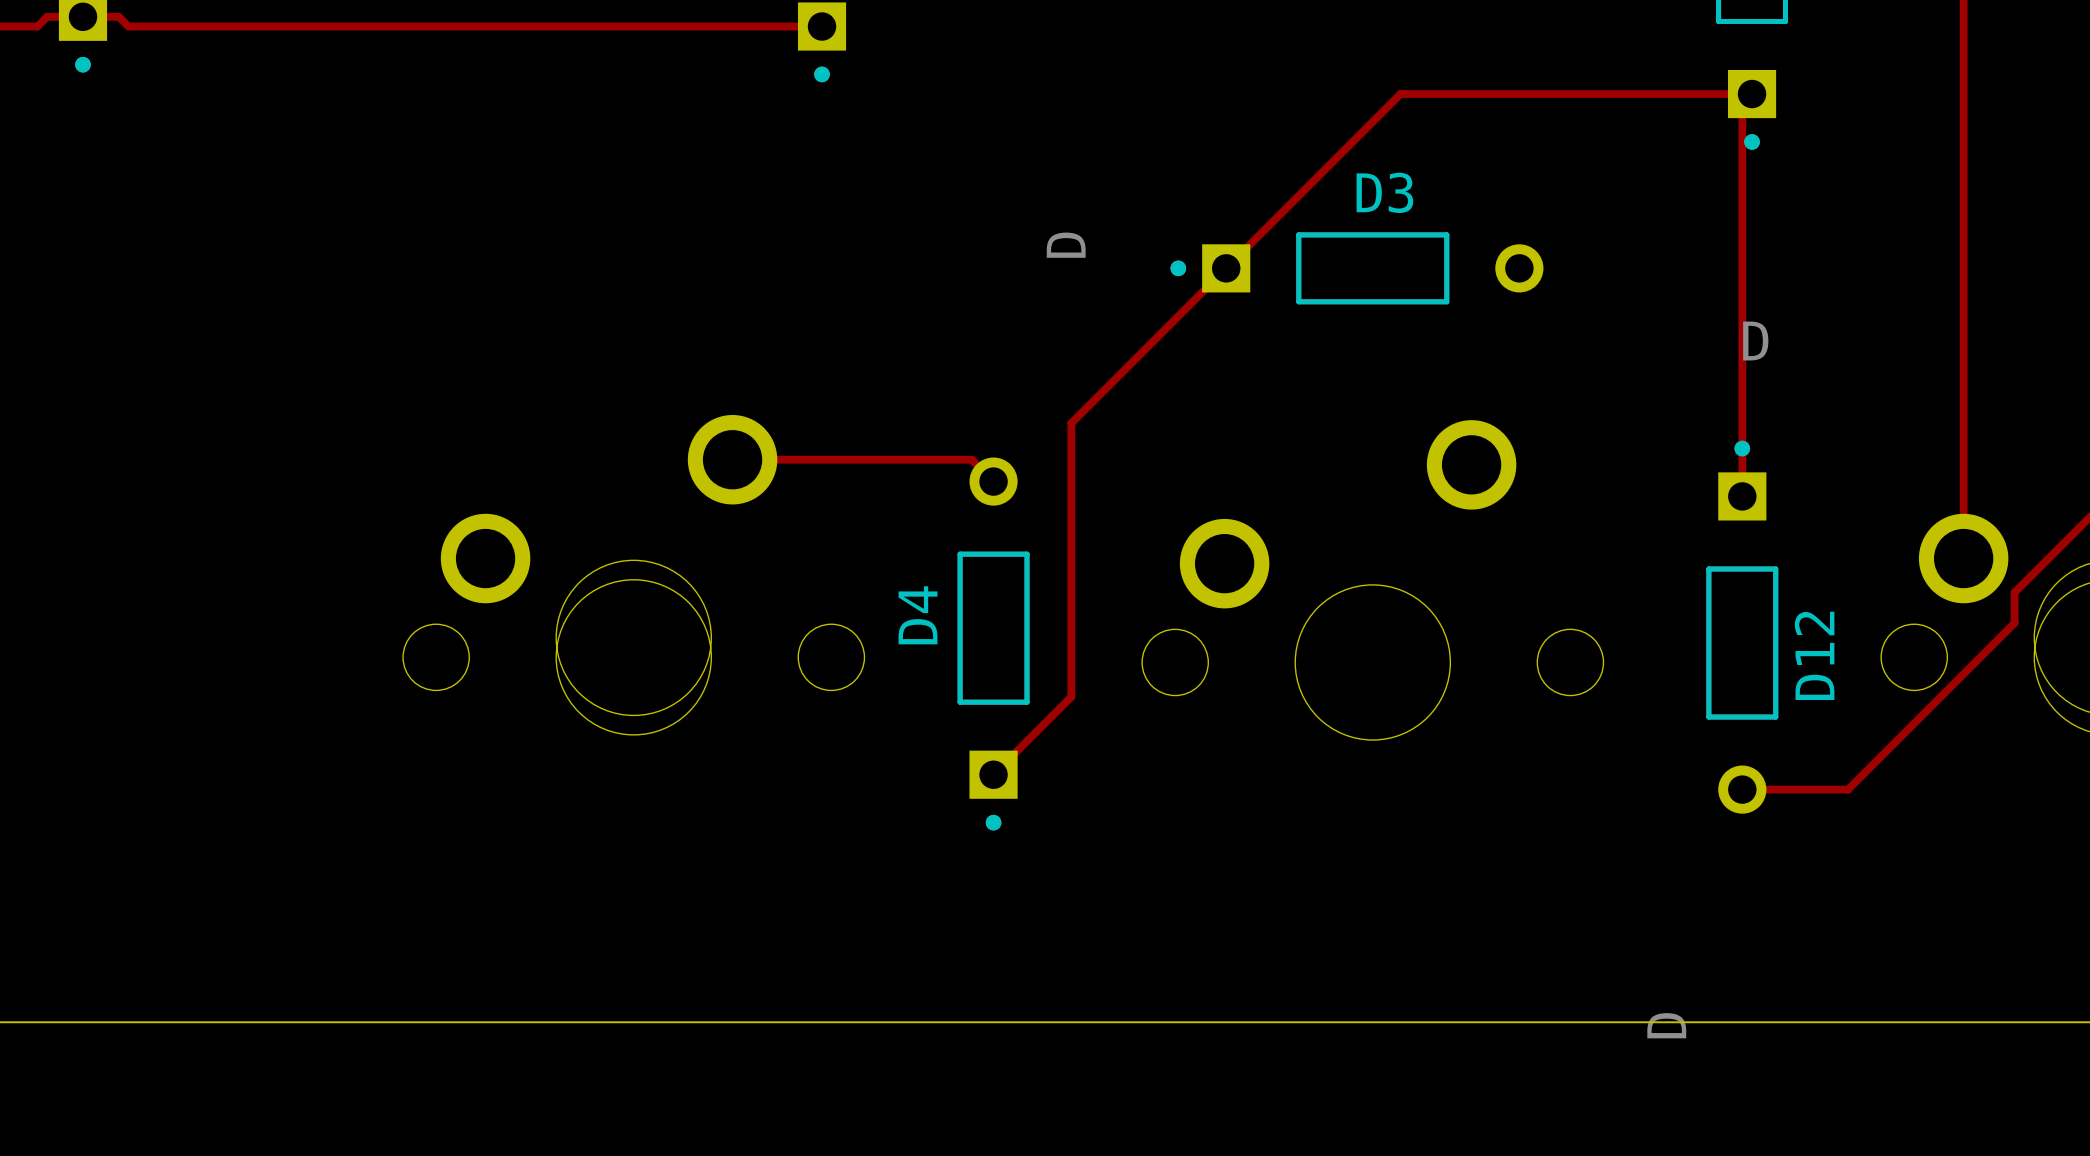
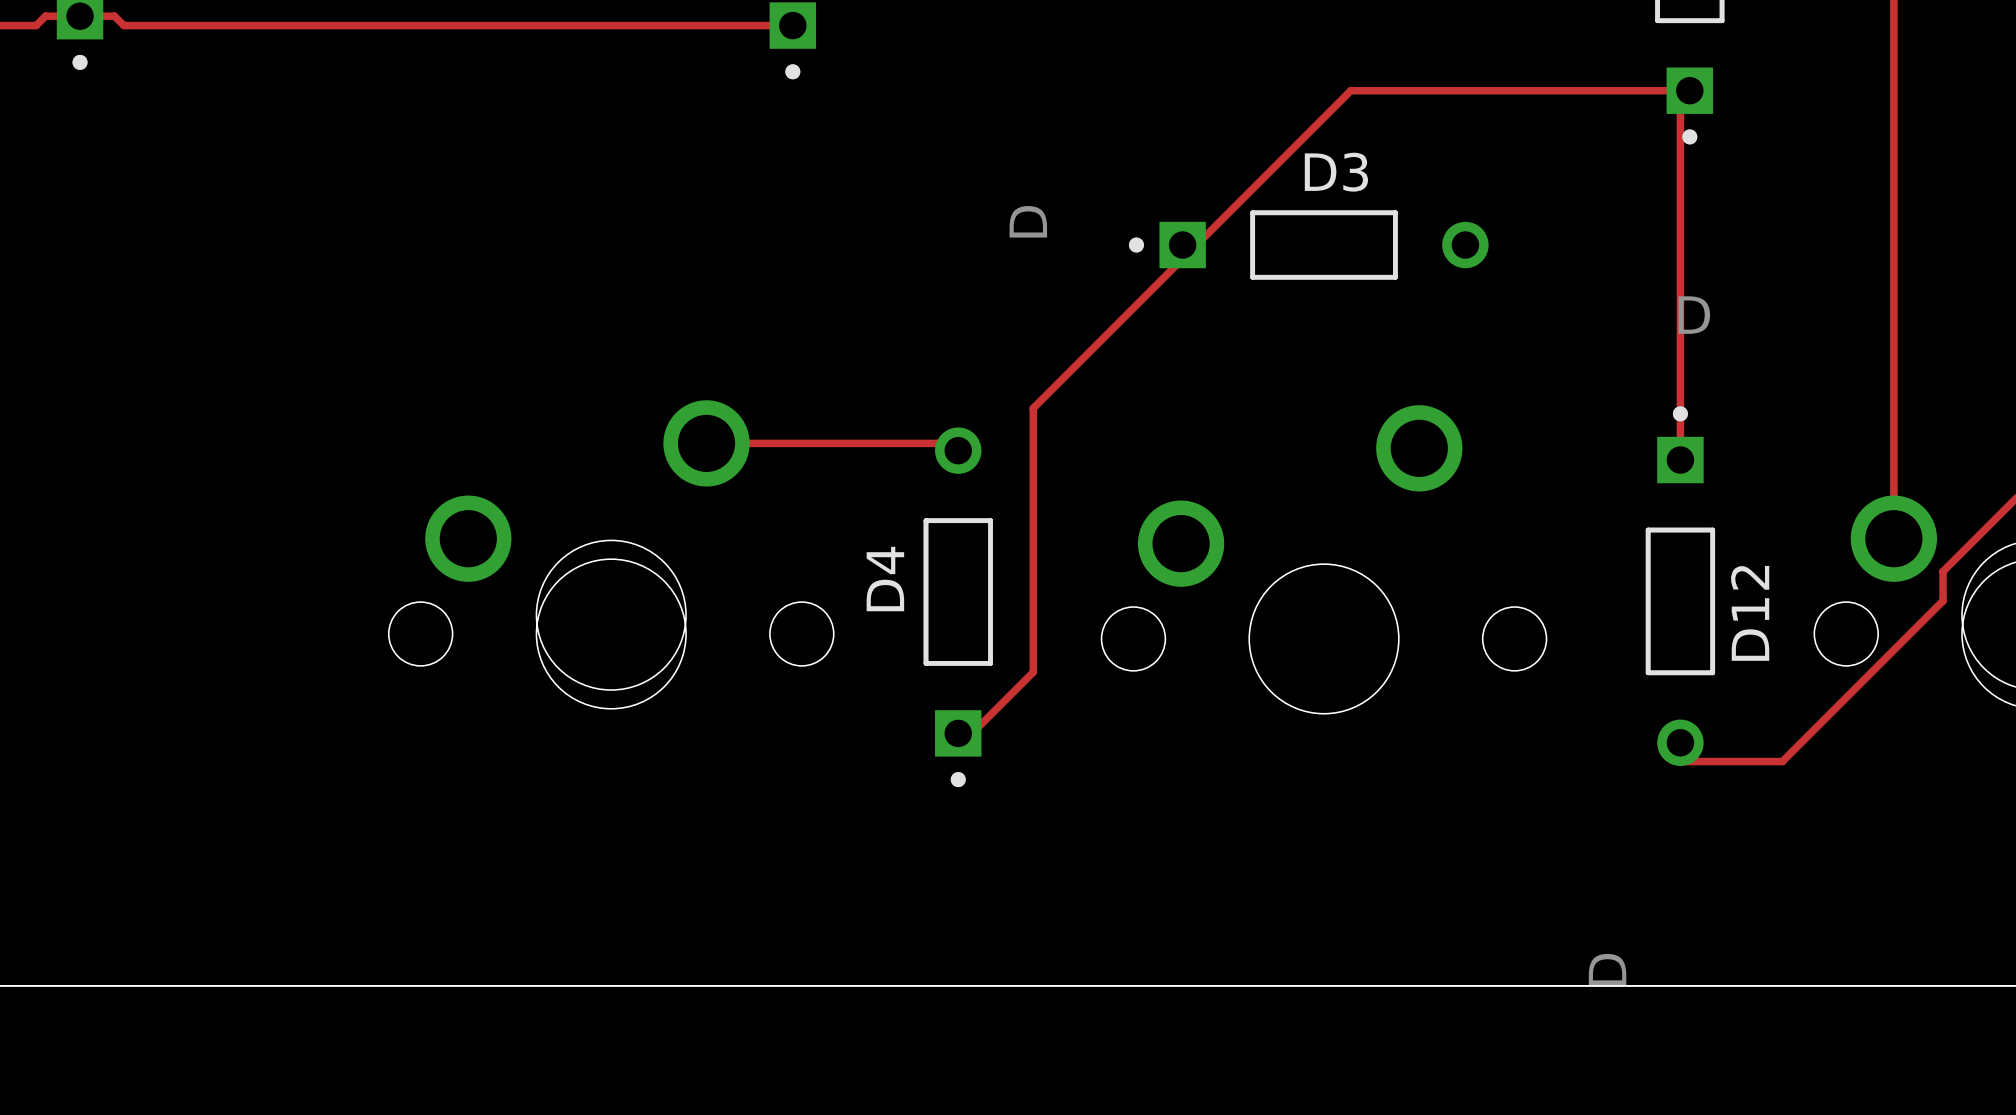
D3 position: (1357, 268) -> (1308, 245)
D12 position: (1742, 627) -> (1680, 586)
D4 position: (993, 643) -> (958, 607)

